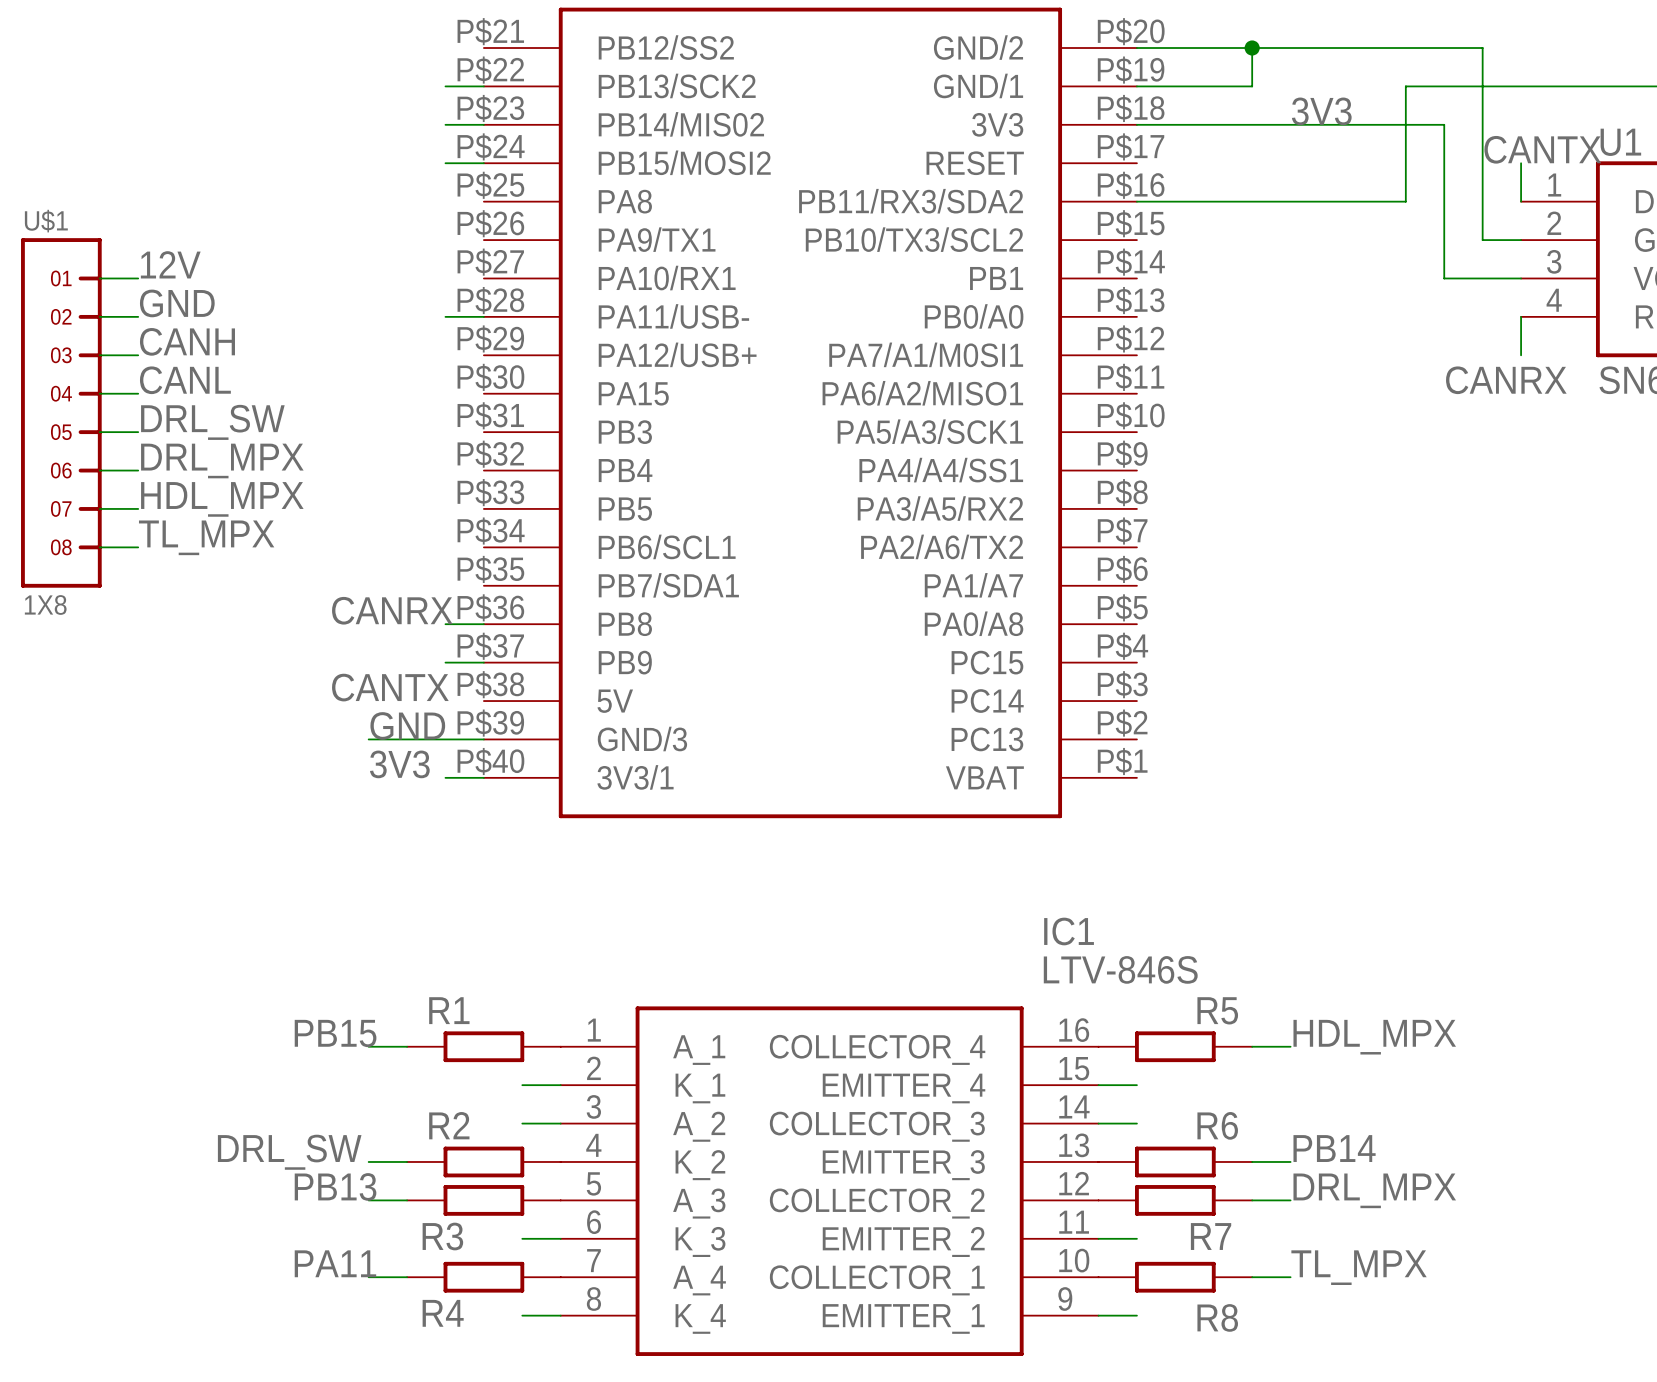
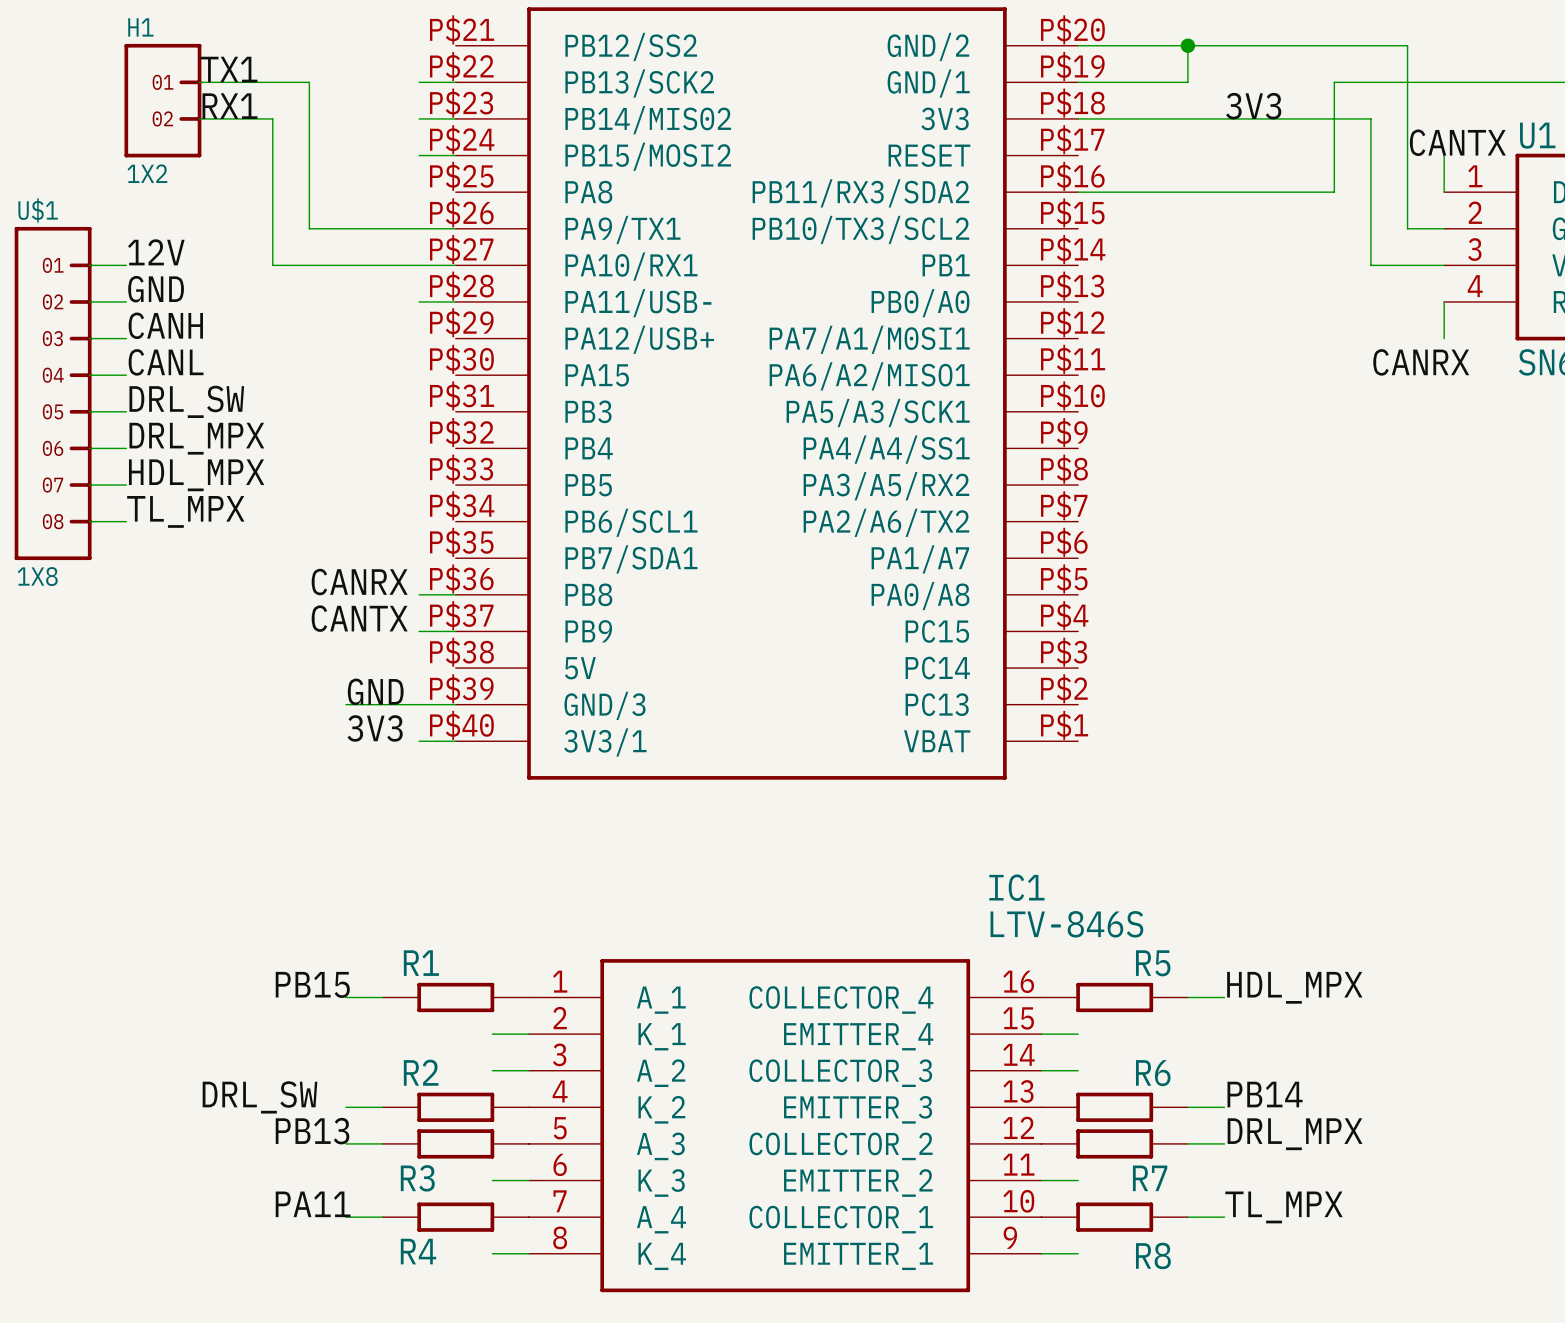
label: none -> TX1 (228, 69)
wire: none -> (199, 82) (309, 82) (309, 228) (455, 228)
H1: none -> 1X2 (162, 100)
label: none -> RX1 (229, 106)
wire: none -> (199, 118) (272, 118) (272, 265) (455, 265)
label position: CANTX (390, 687) -> CANTX (359, 618)

